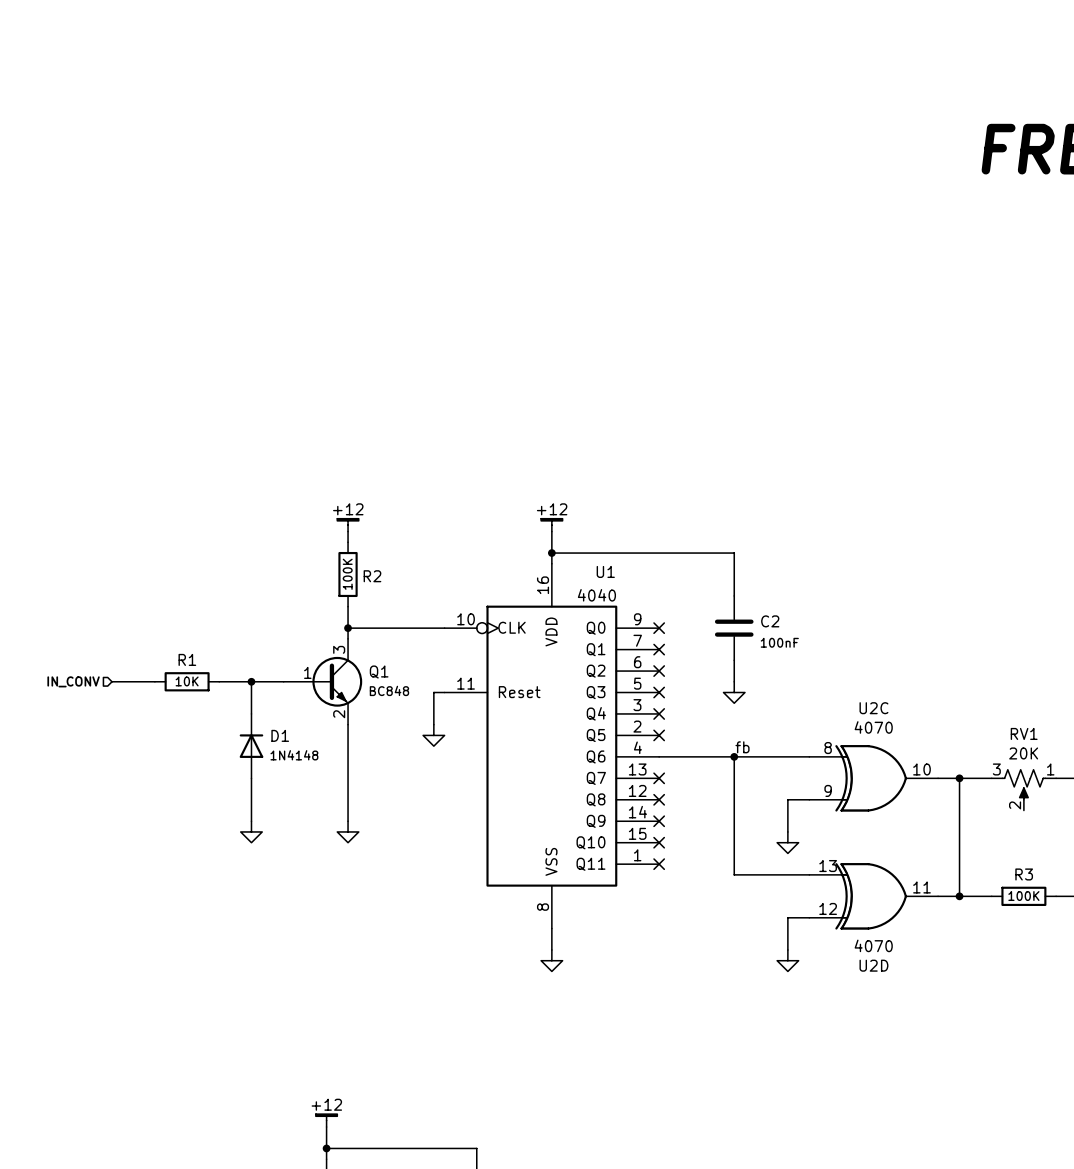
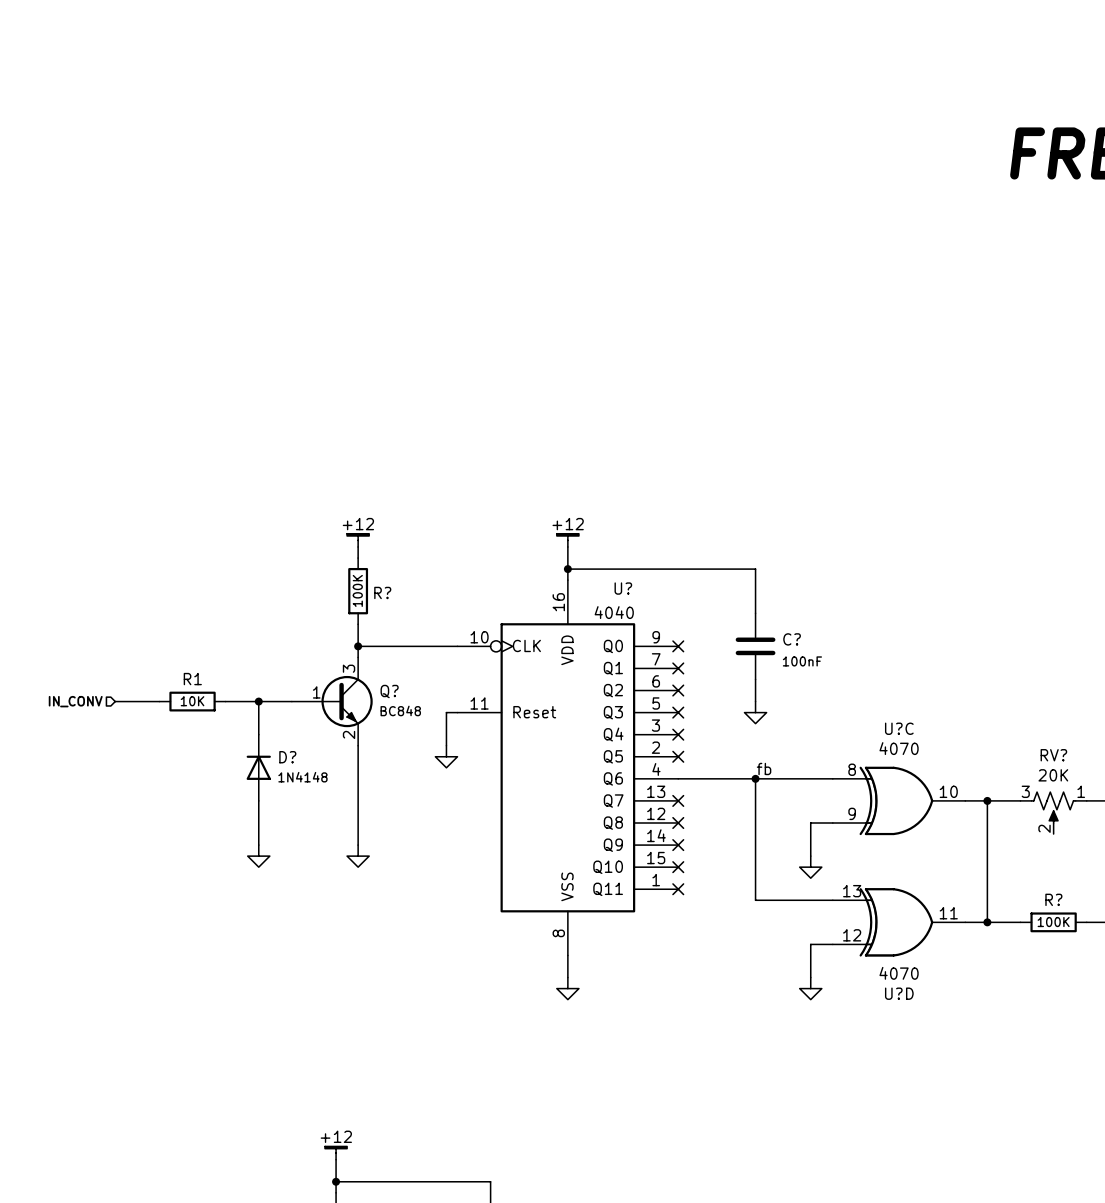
U1 name: U1 (605, 571) -> U? (623, 588)
R2 name: R2 (372, 576) -> R? (382, 592)
C2 name: C2 (770, 621) -> C? (792, 639)
Q1 name: Q1 (379, 672) -> Q? (389, 691)
U2C name: U2C (873, 708) -> U?C (899, 728)
RV1 name: RV1 (1024, 733) -> RV? (1053, 755)
D1 name: D1 (280, 735) -> D? (287, 757)
R3 name: R3 (1024, 874) -> R? (1053, 899)
U2D name: U2D (873, 965) -> U?D (899, 993)

